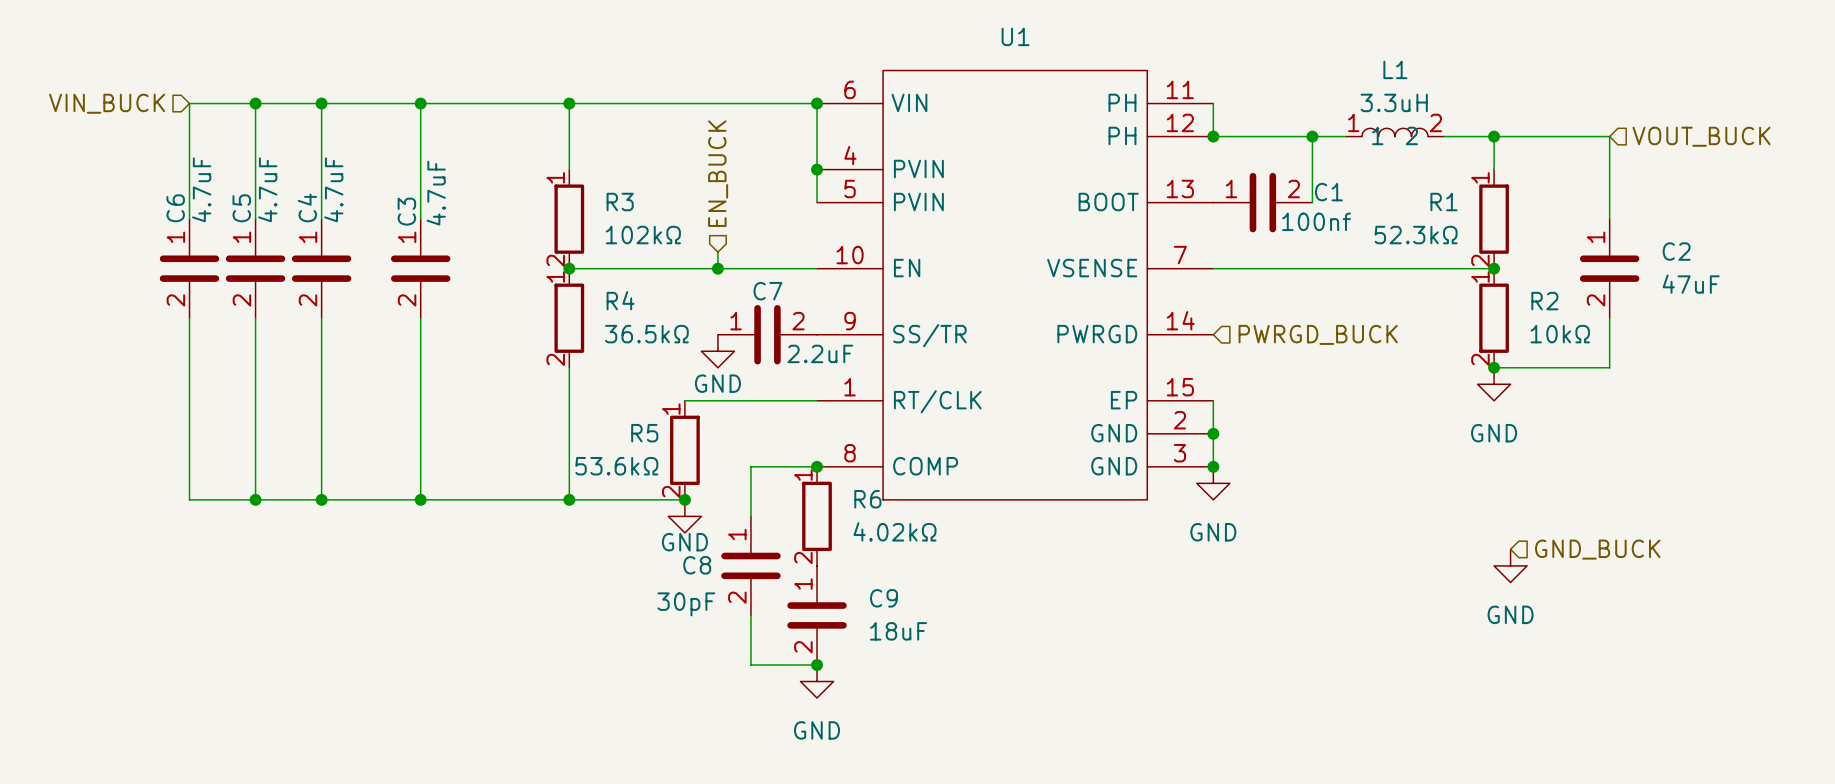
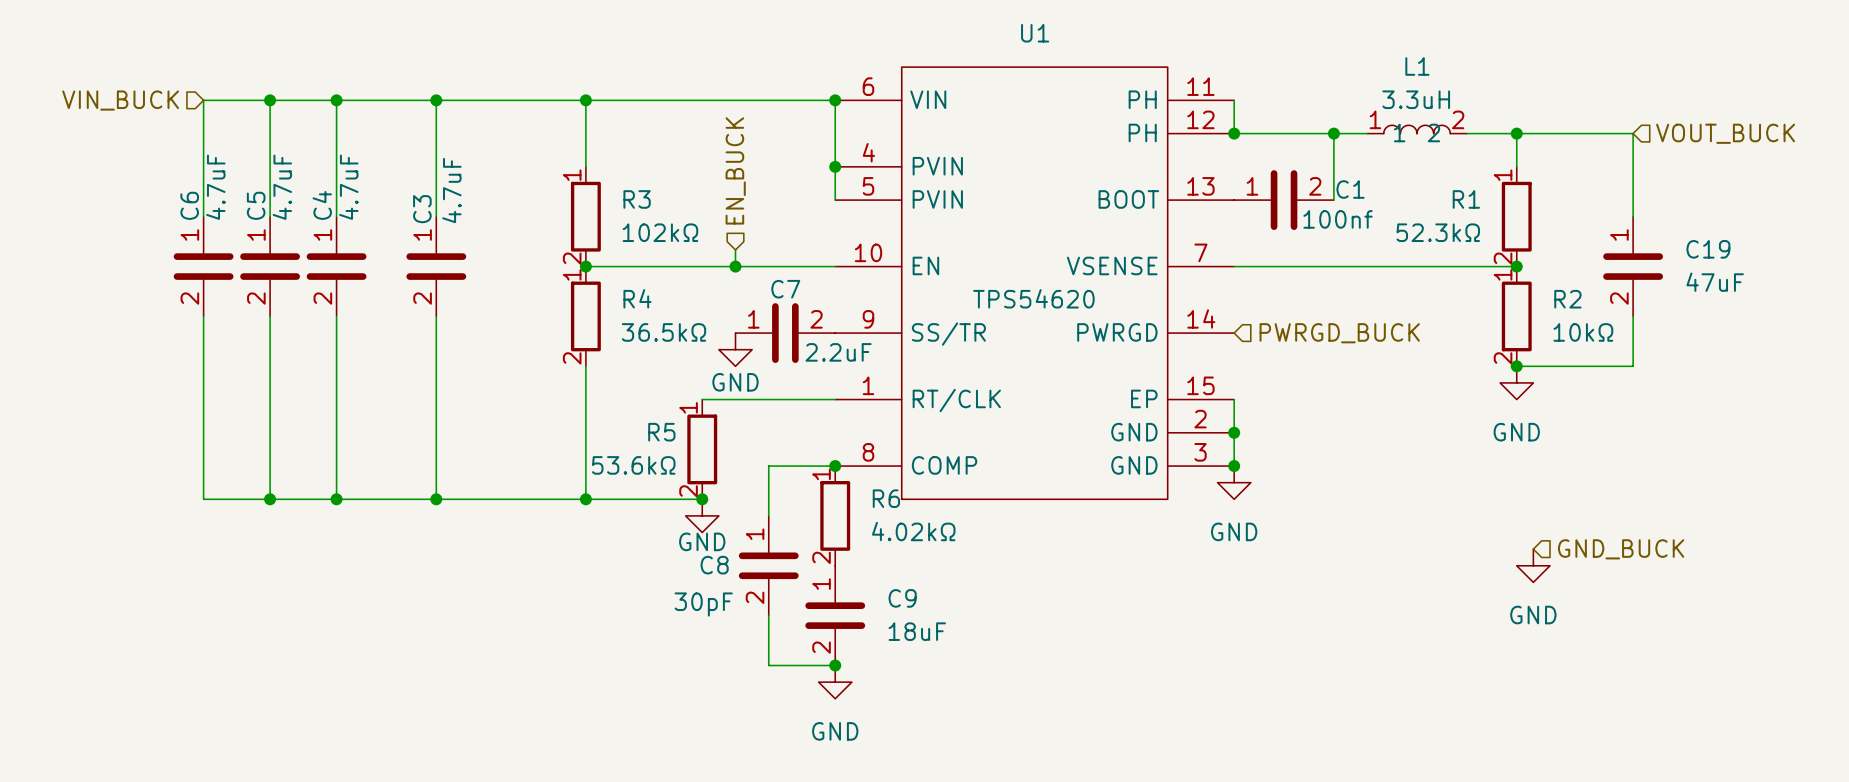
C2 name: C2 (1676, 251) -> C19 (1708, 249)
U1 value: none -> TPS54620 (1033, 298)

